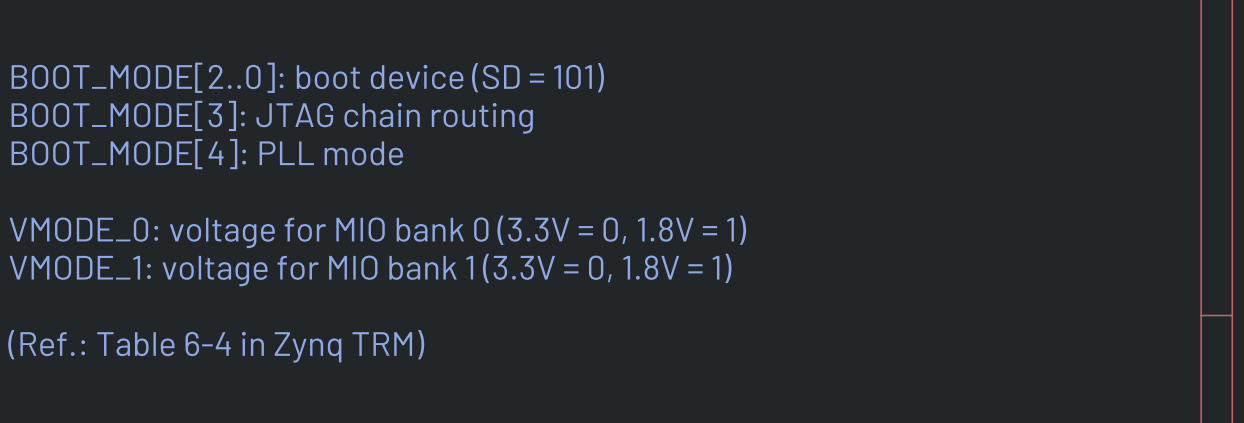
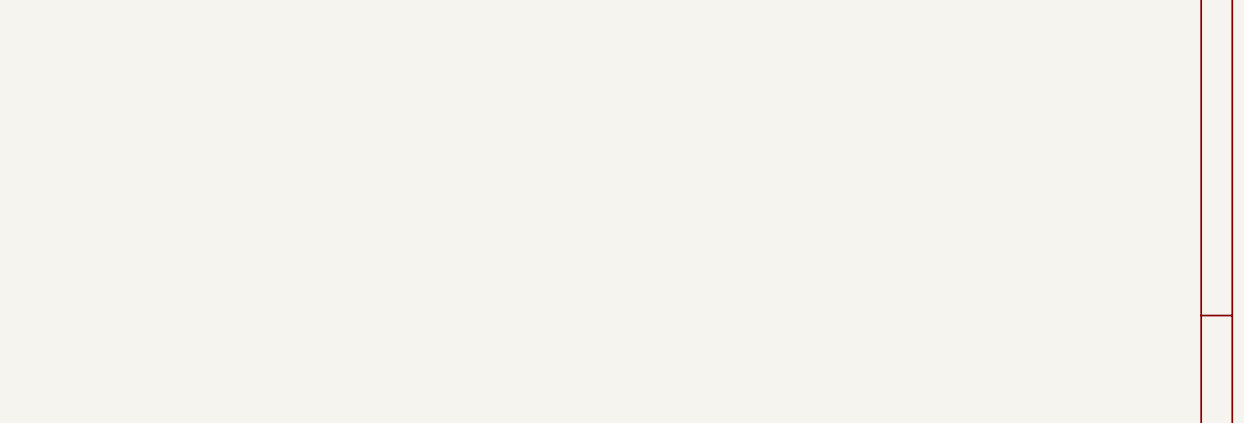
text: BOOT_MODE[2..0]: boot device (SD = 101) (307, 77) -> none
text: BOOT_MODE[3]: JTAG chain routing (272, 117) -> none
text: BOOT_MODE[4]: PLL mode (207, 154) -> none
text: VMODE_0: voltage for MIO bank 0 (3.3V = 0, 1.8V = 1) (377, 231) -> none
text: VMODE_1: voltage for MIO bank 1 (3.3V = 0, 1.8V = 1) (370, 270) -> none
text: (Ref.: Table 6-4 in Zynq TRM) (216, 346) -> none

